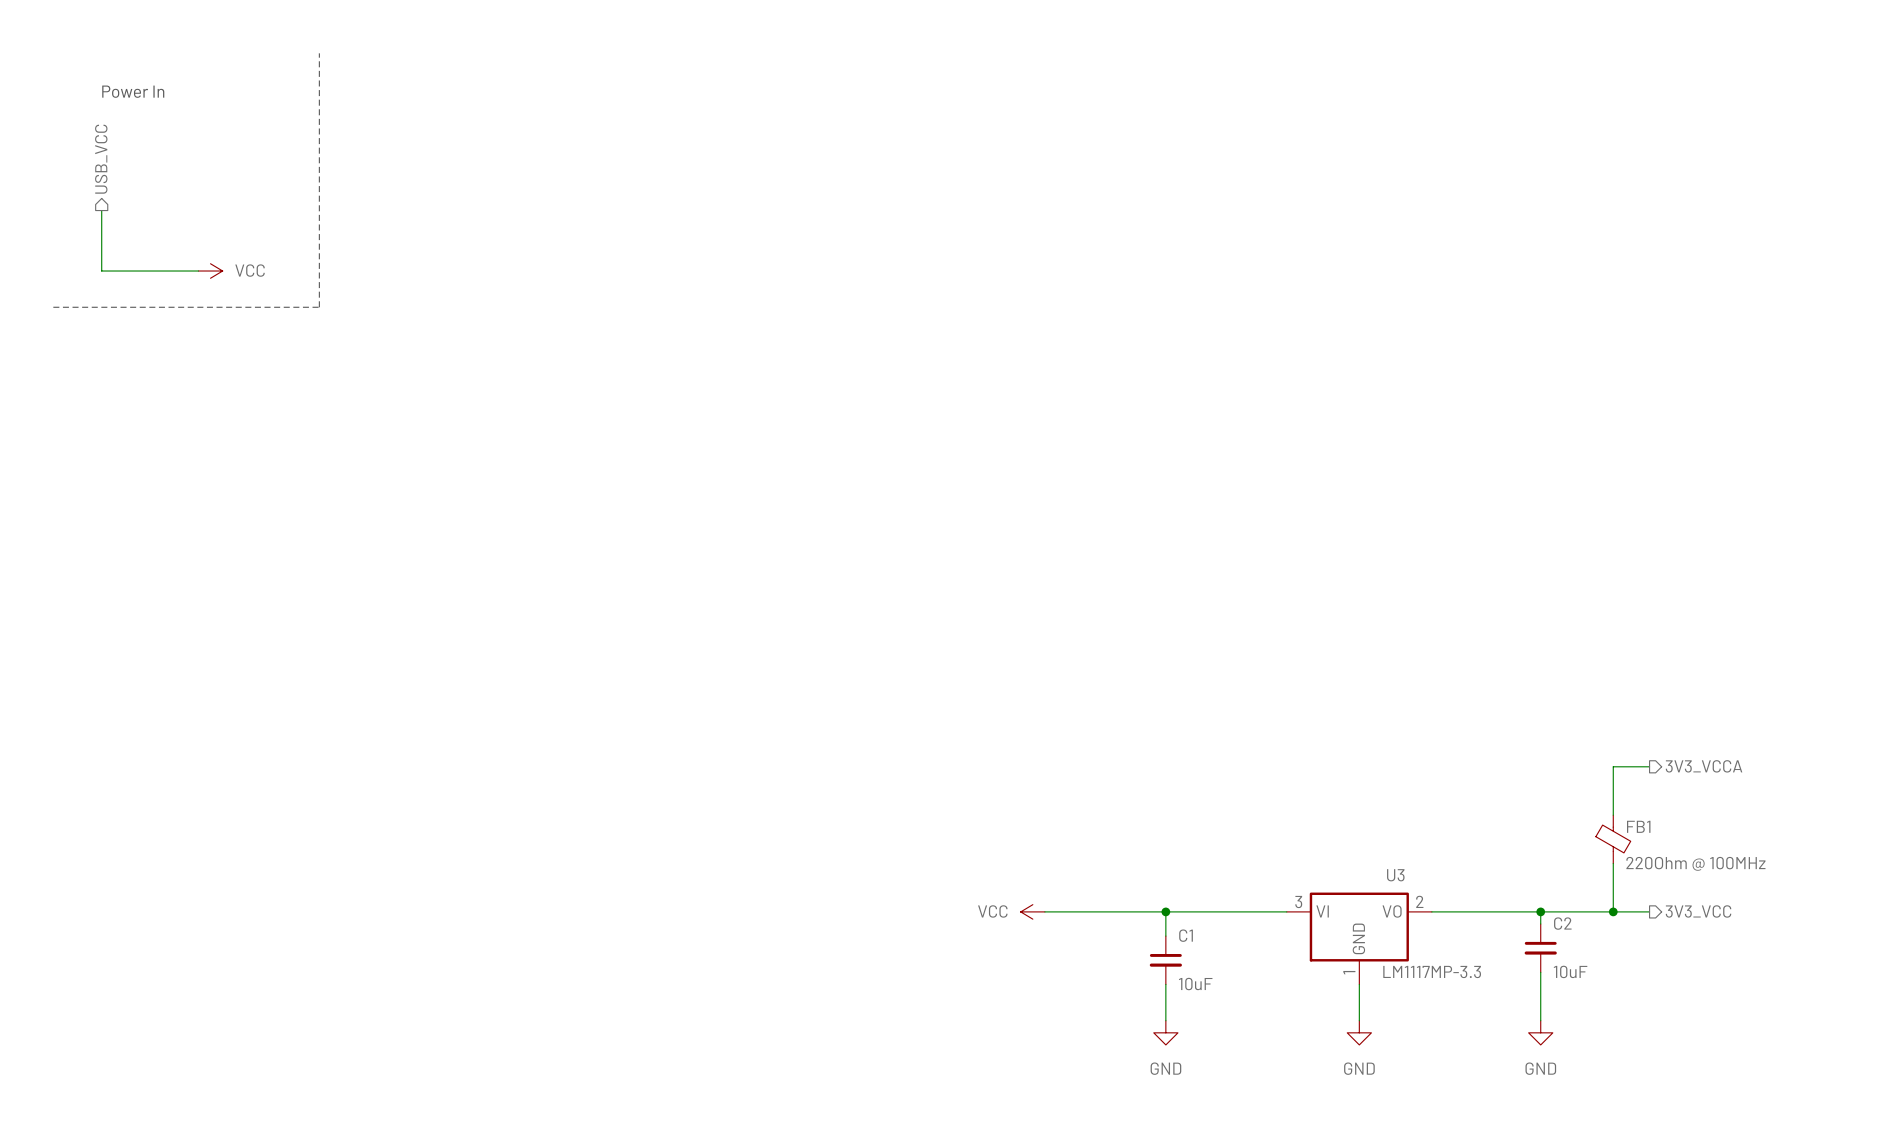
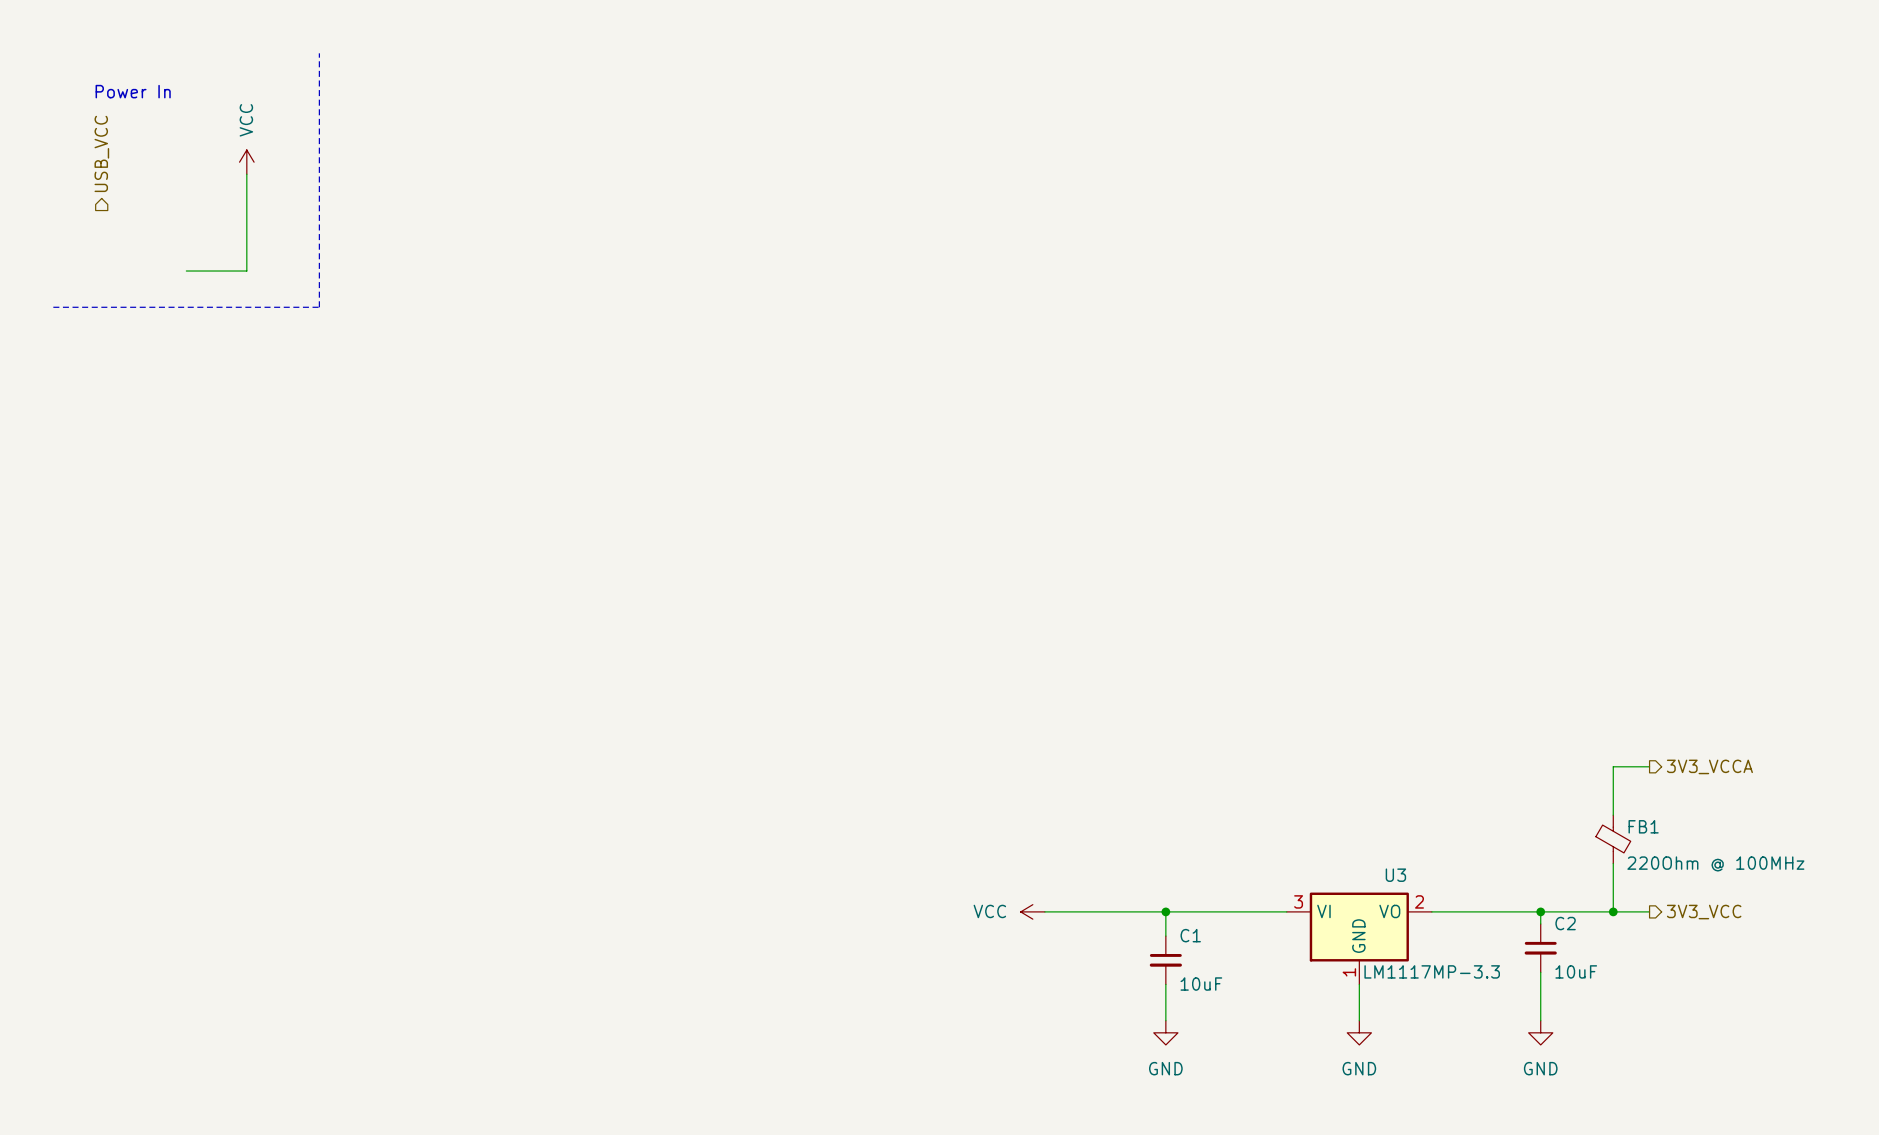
wire: none -> (246, 174) (246, 271) (198, 271)
wire: (101, 210) (101, 271) (186, 271) -> none
power symbol rotation: 0° (210, 271) -> 90° counterclockwise (246, 162)
power symbol position: VCC (210, 271) -> VCC (246, 162)

